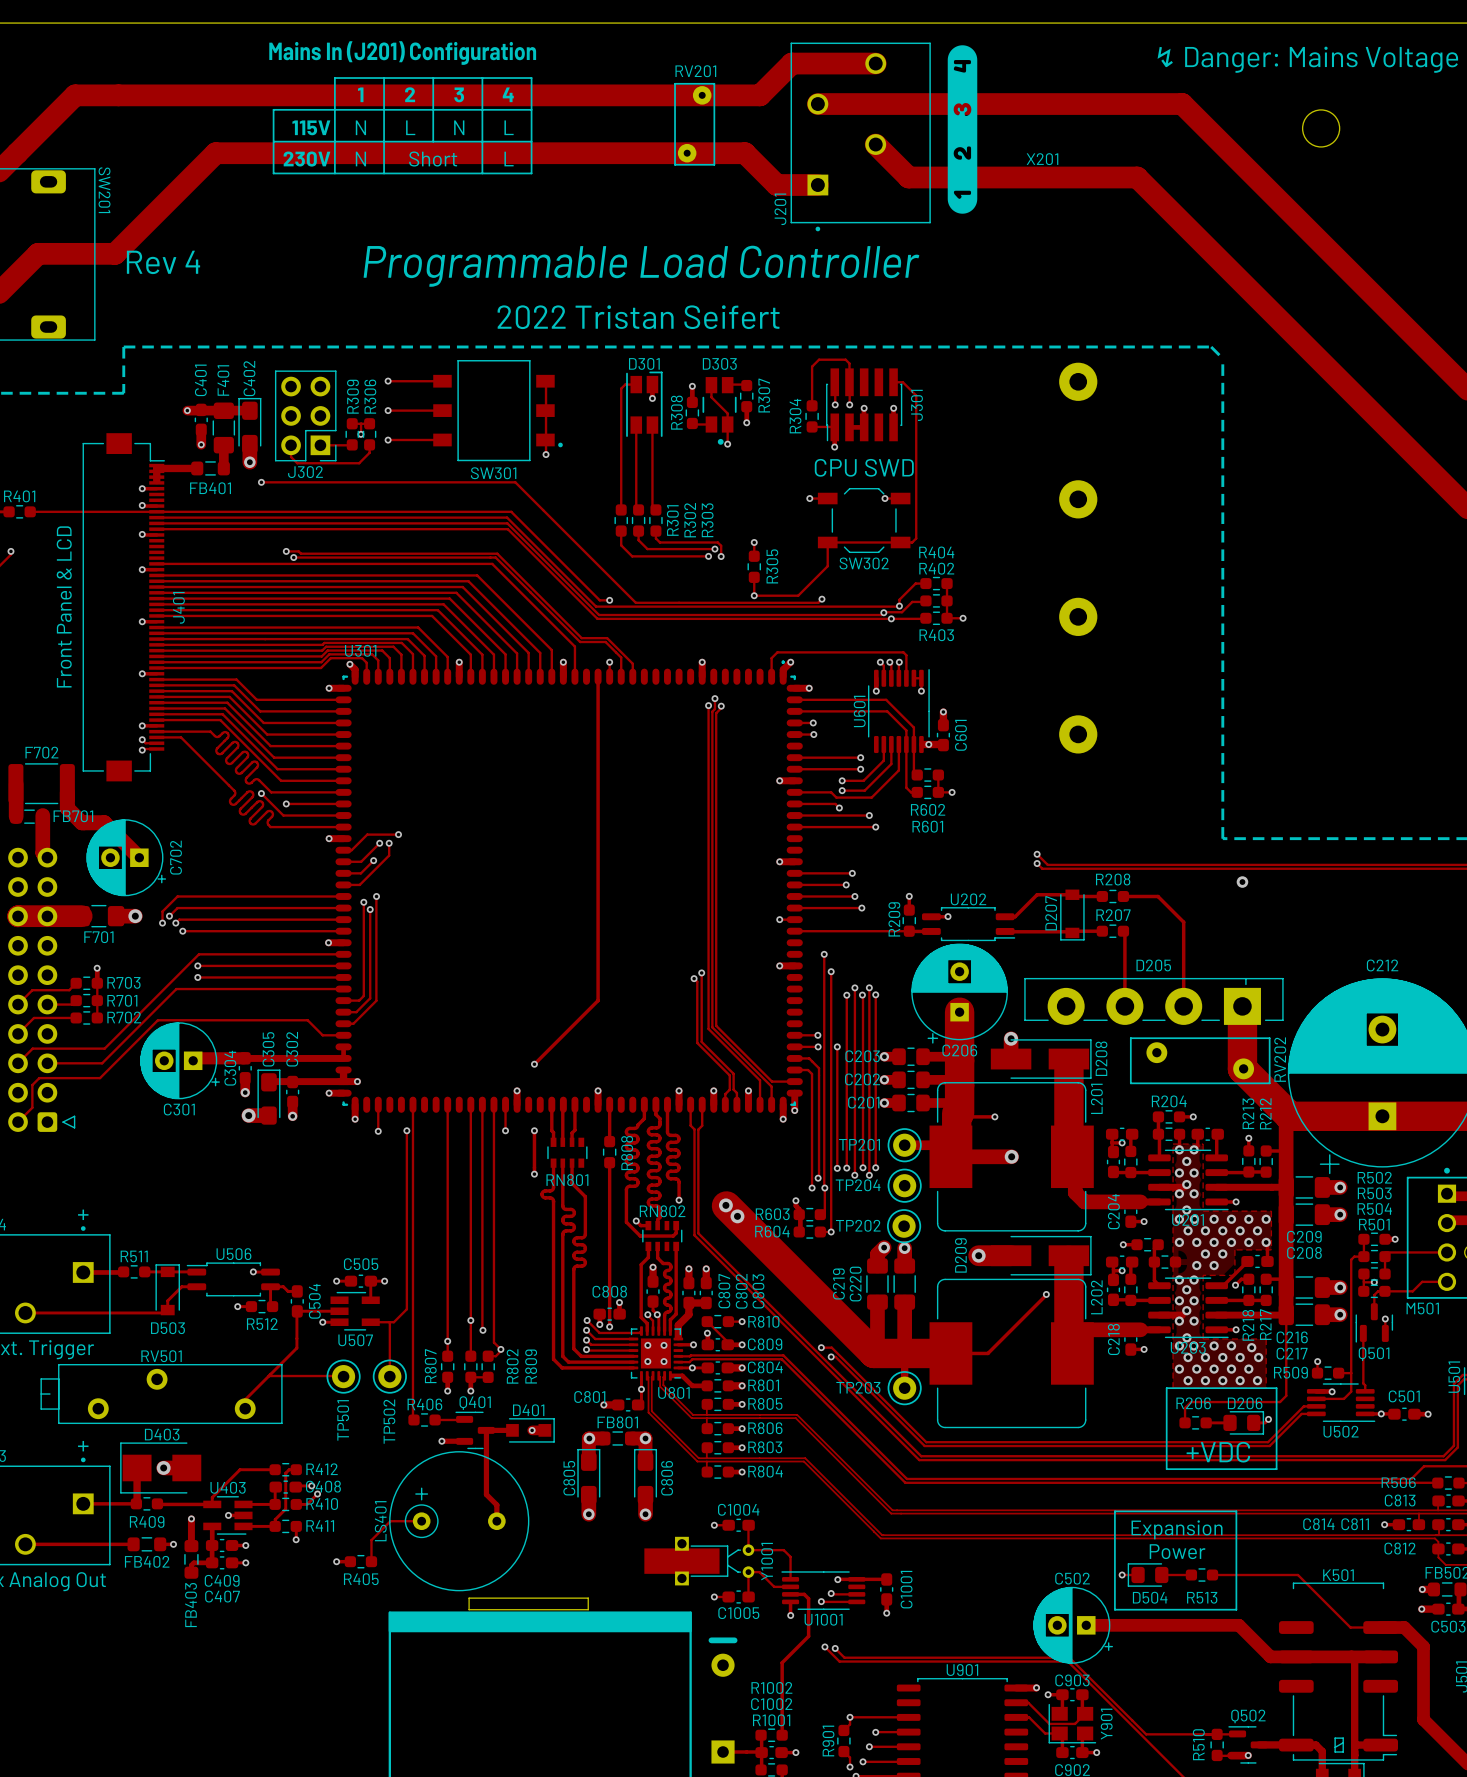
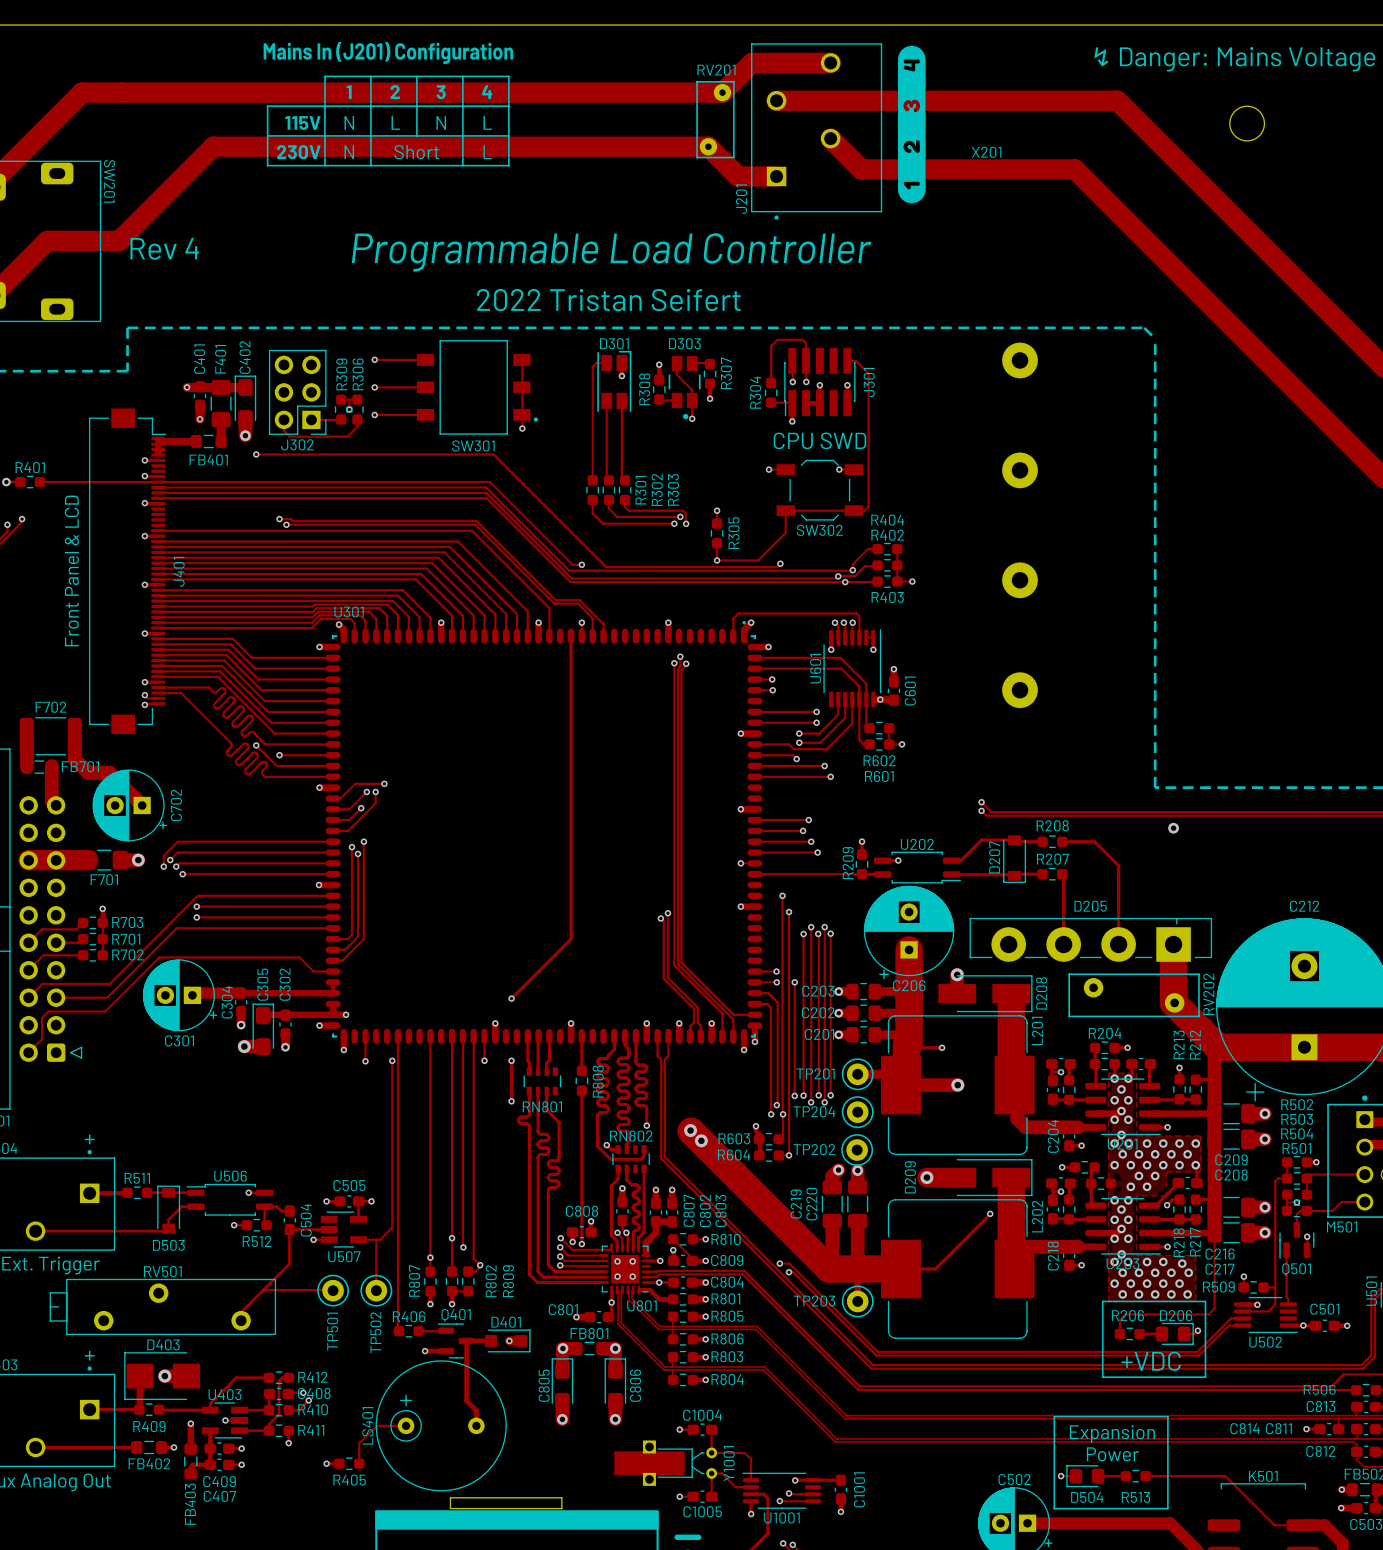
RV201 position: (694, 124) -> (715, 119)

